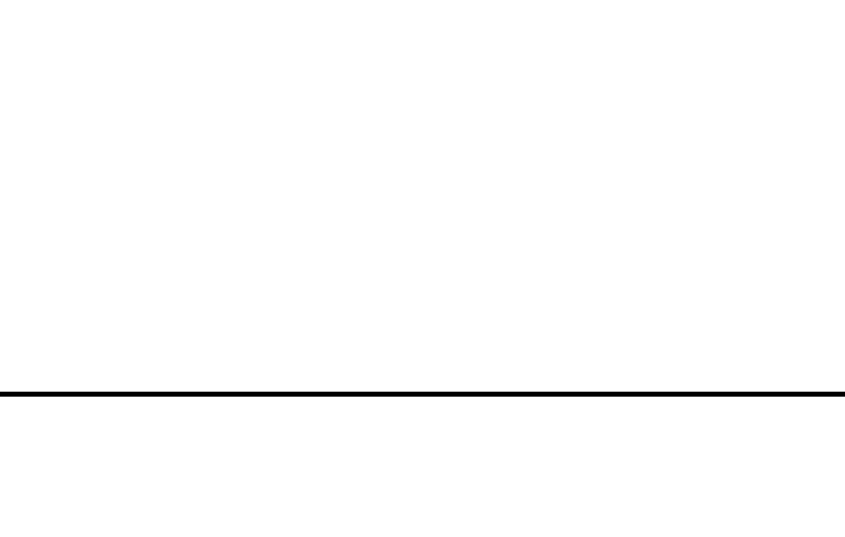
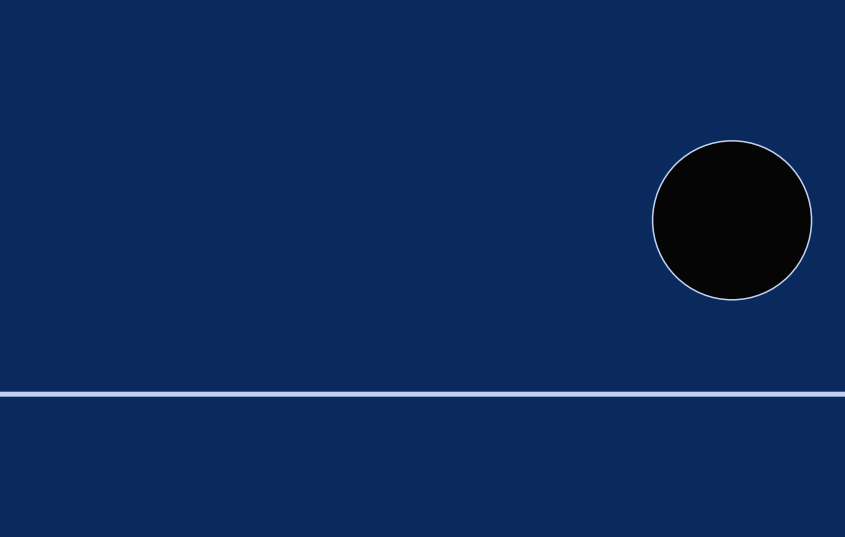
part: none -> (732, 220)

